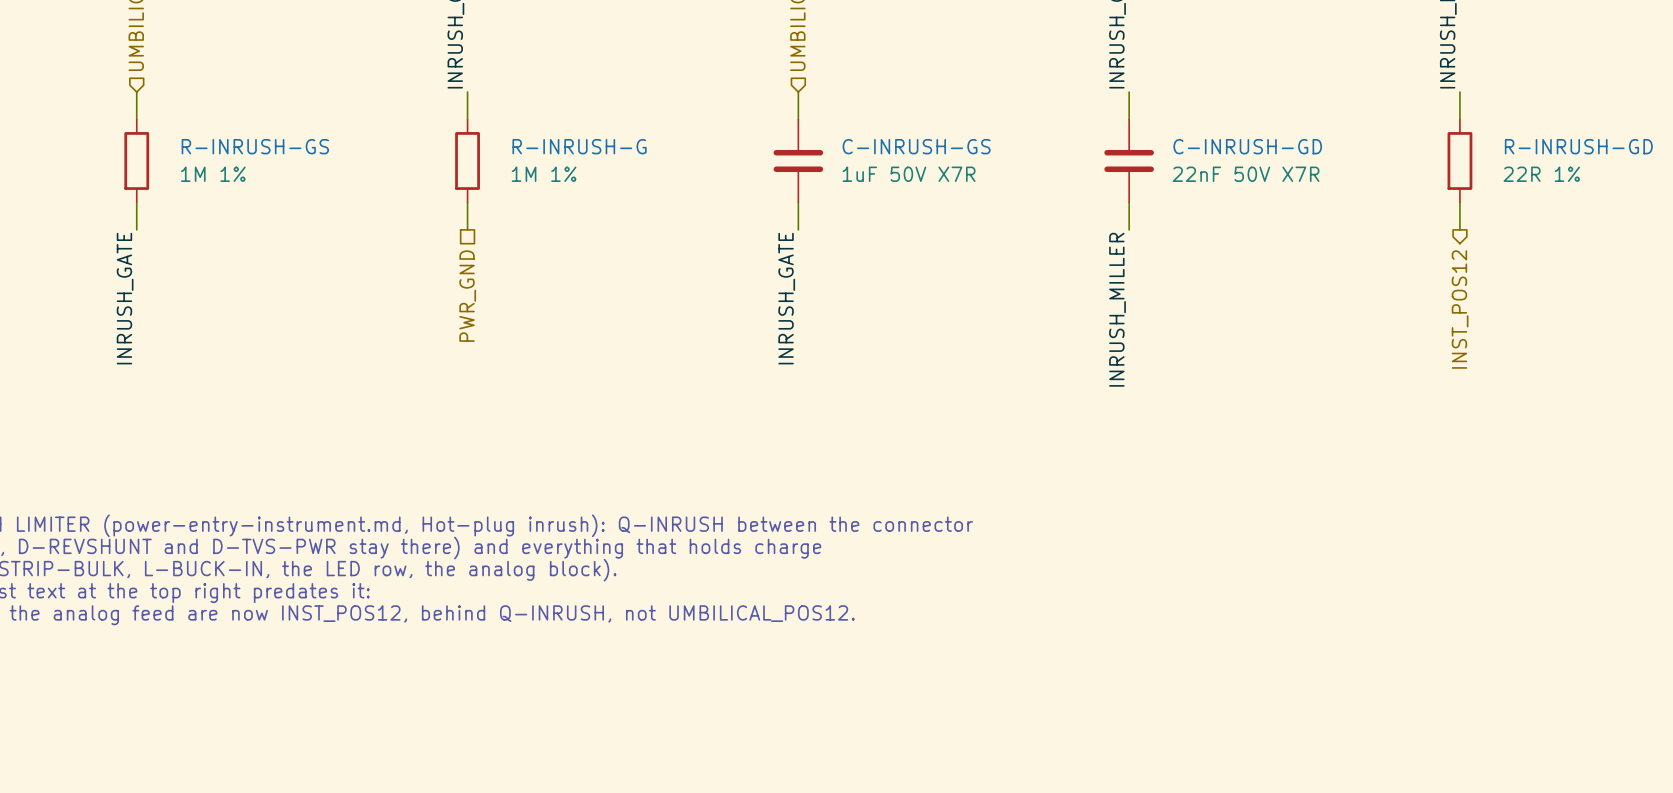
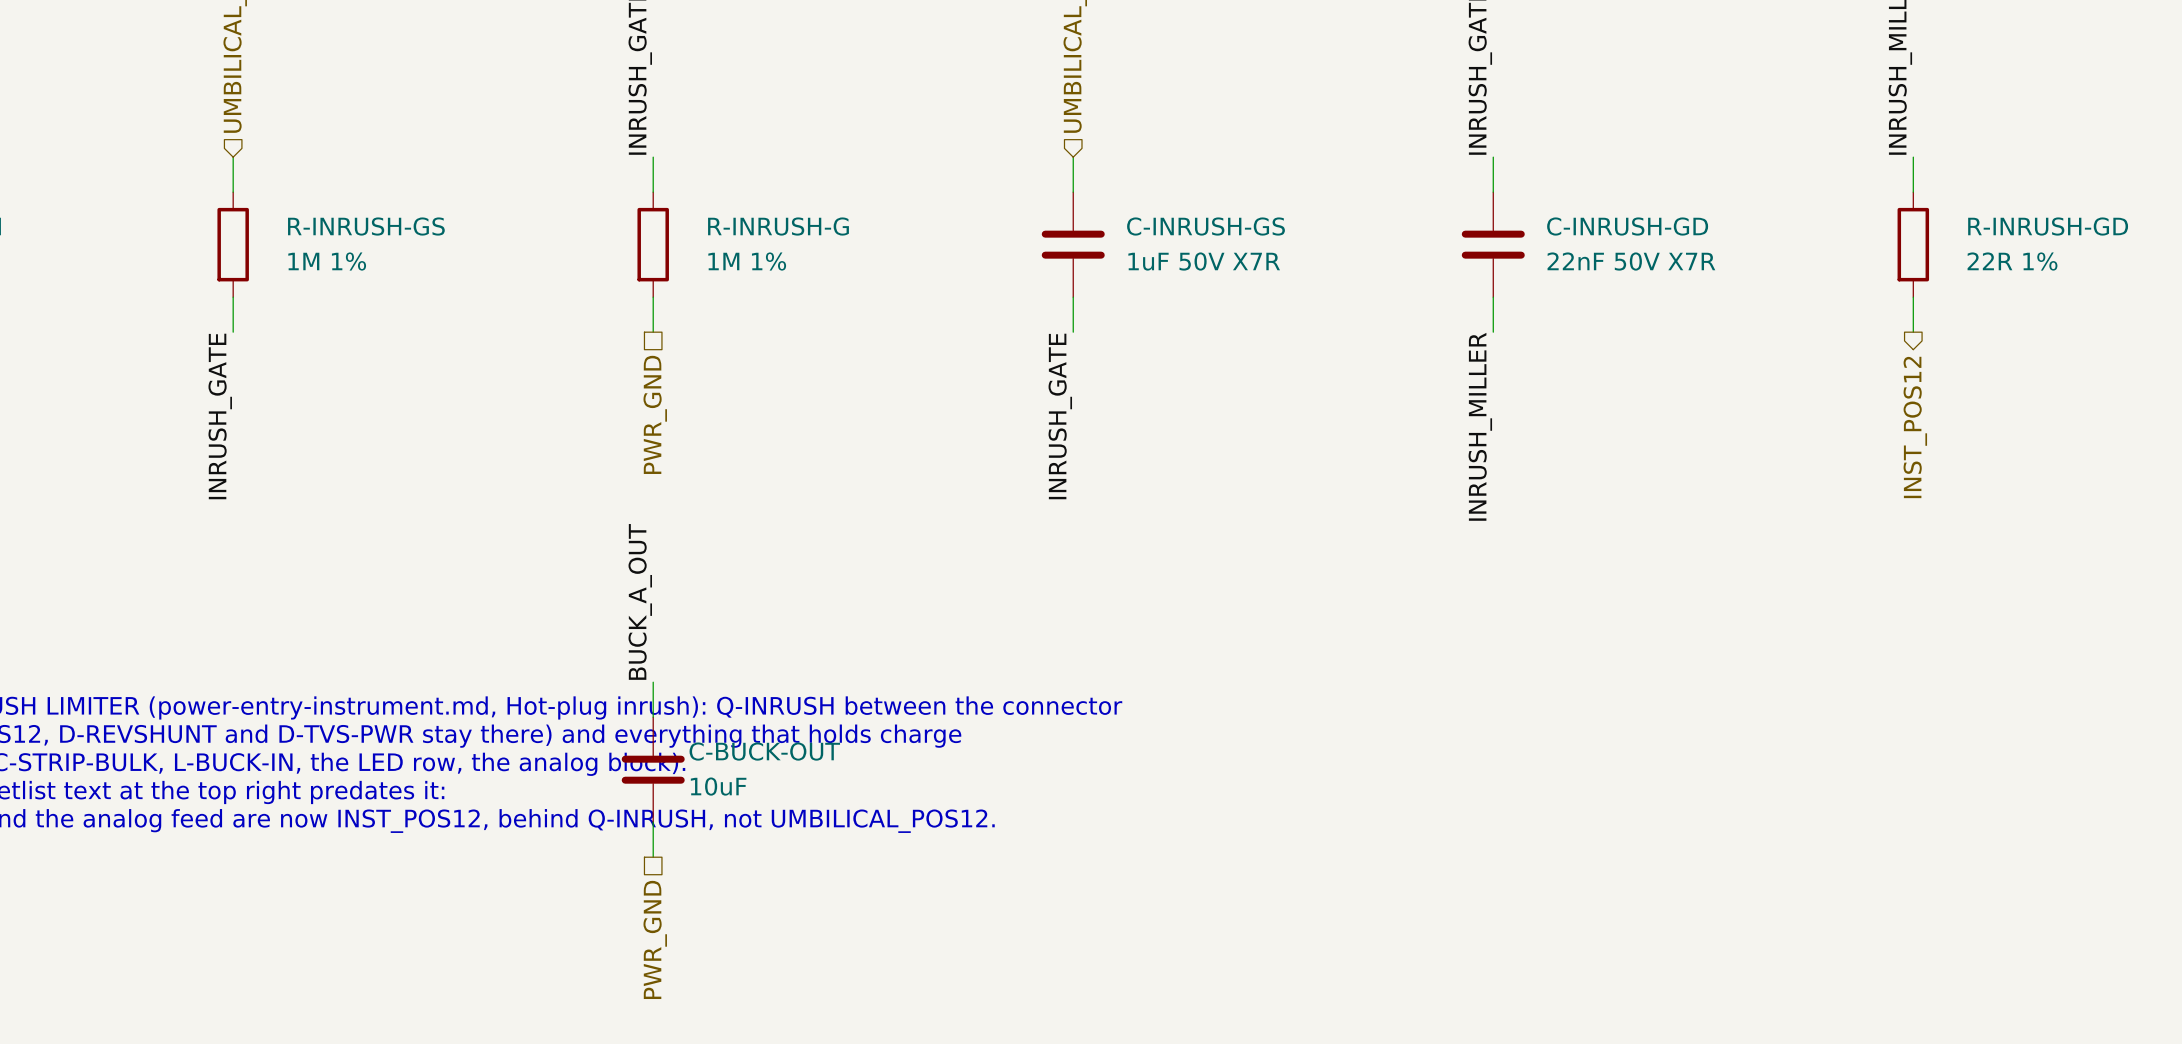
label: none -> BUCK_A_OUT (640, 601)
wire: none -> (653, 682) (653, 717)
C-BUCK-OUT: none -> 10uF (653, 769)
wire: none -> (653, 822) (653, 857)
hierarchical label: none -> PWR_GND (655, 939)

